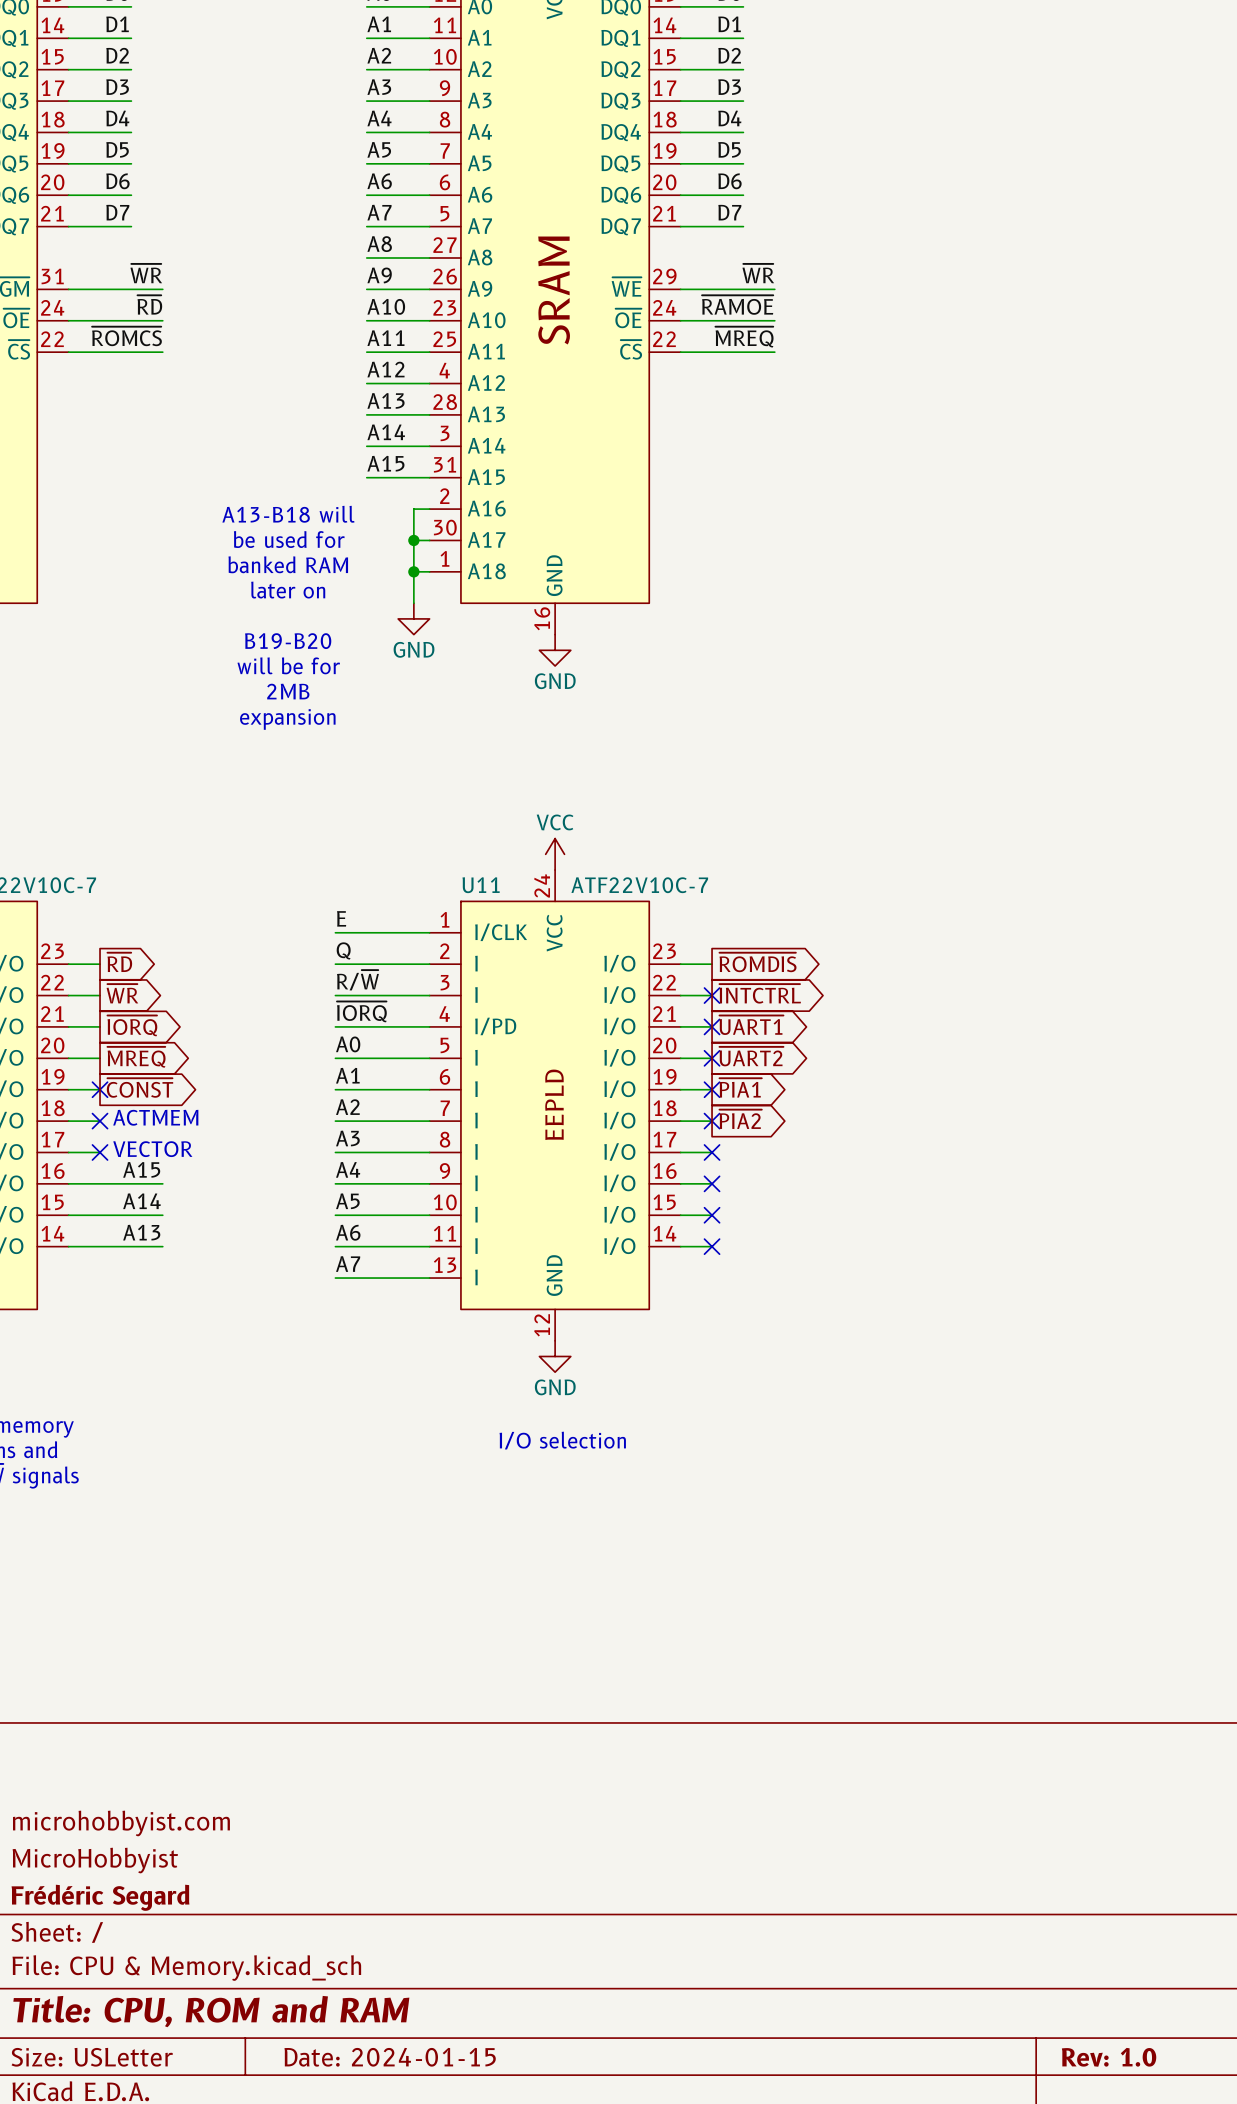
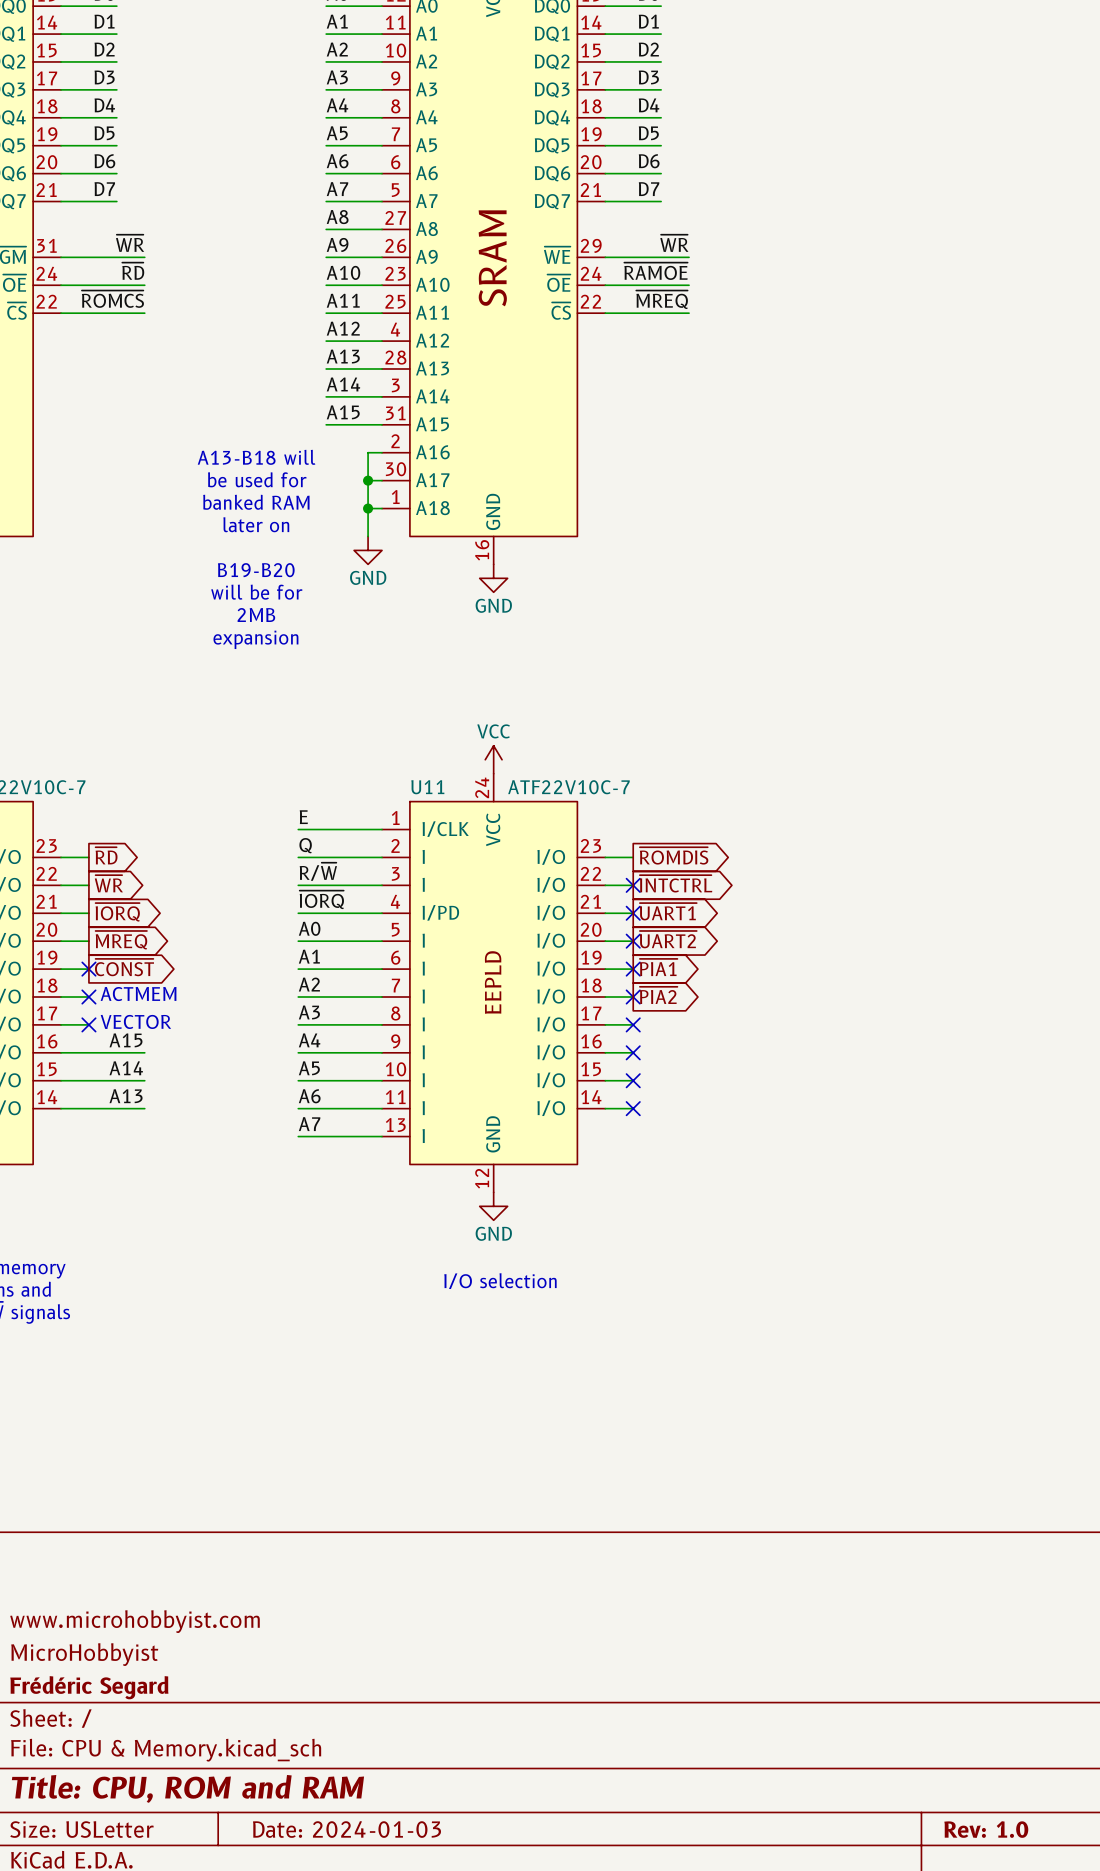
title block: microhobbyist.com (121, 1823) -> www.microhobbyist.com (134, 1621)
title block: Date: 2024-01-15 (390, 2057) -> Date: 2024-01-03 (346, 1829)

